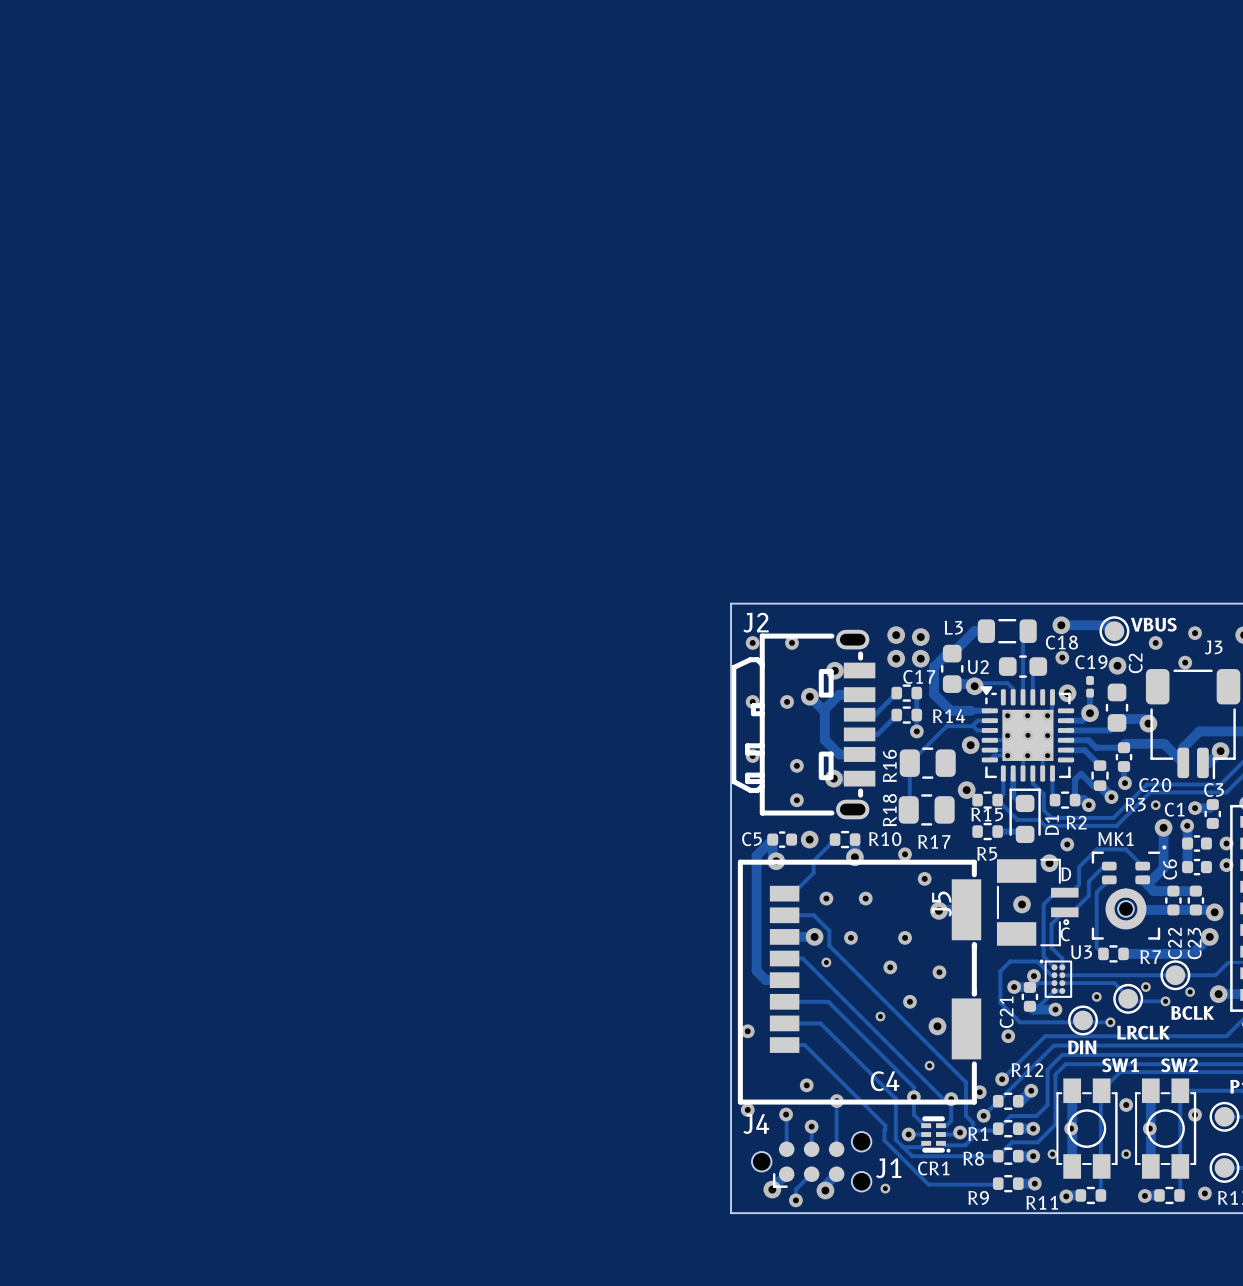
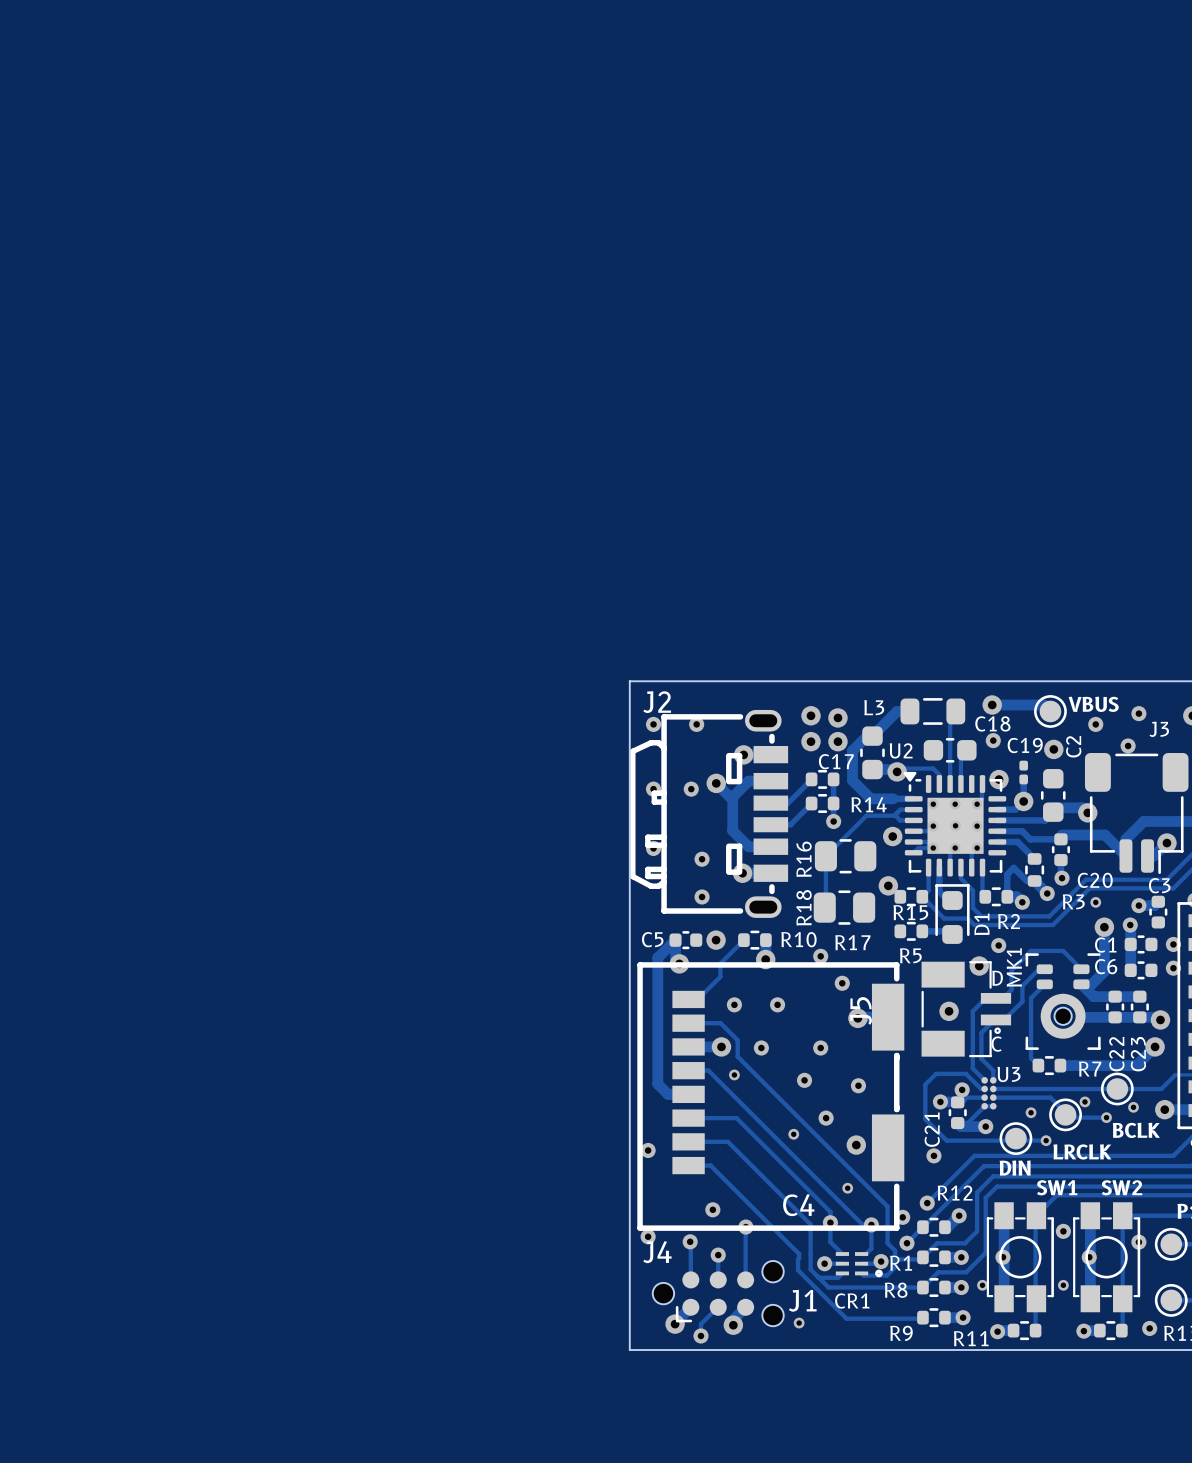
C1 name position: C1 (1174, 809) -> C1 (1105, 945)
MK1 name rotation: 0° (1116, 839) -> 90° counterclockwise (1014, 967)
MK1 footprint: [1091, 845, 1167, 940] -> [1025, 953, 1101, 1050]
C6 name rotation: 0° (1170, 869) -> 90° clockwise (1106, 966)
U3 footprint: [1039, 959, 1073, 998] -> [981, 1077, 997, 1110]
CR1 footprint: [921, 1116, 951, 1153] -> [835, 1252, 883, 1278]

